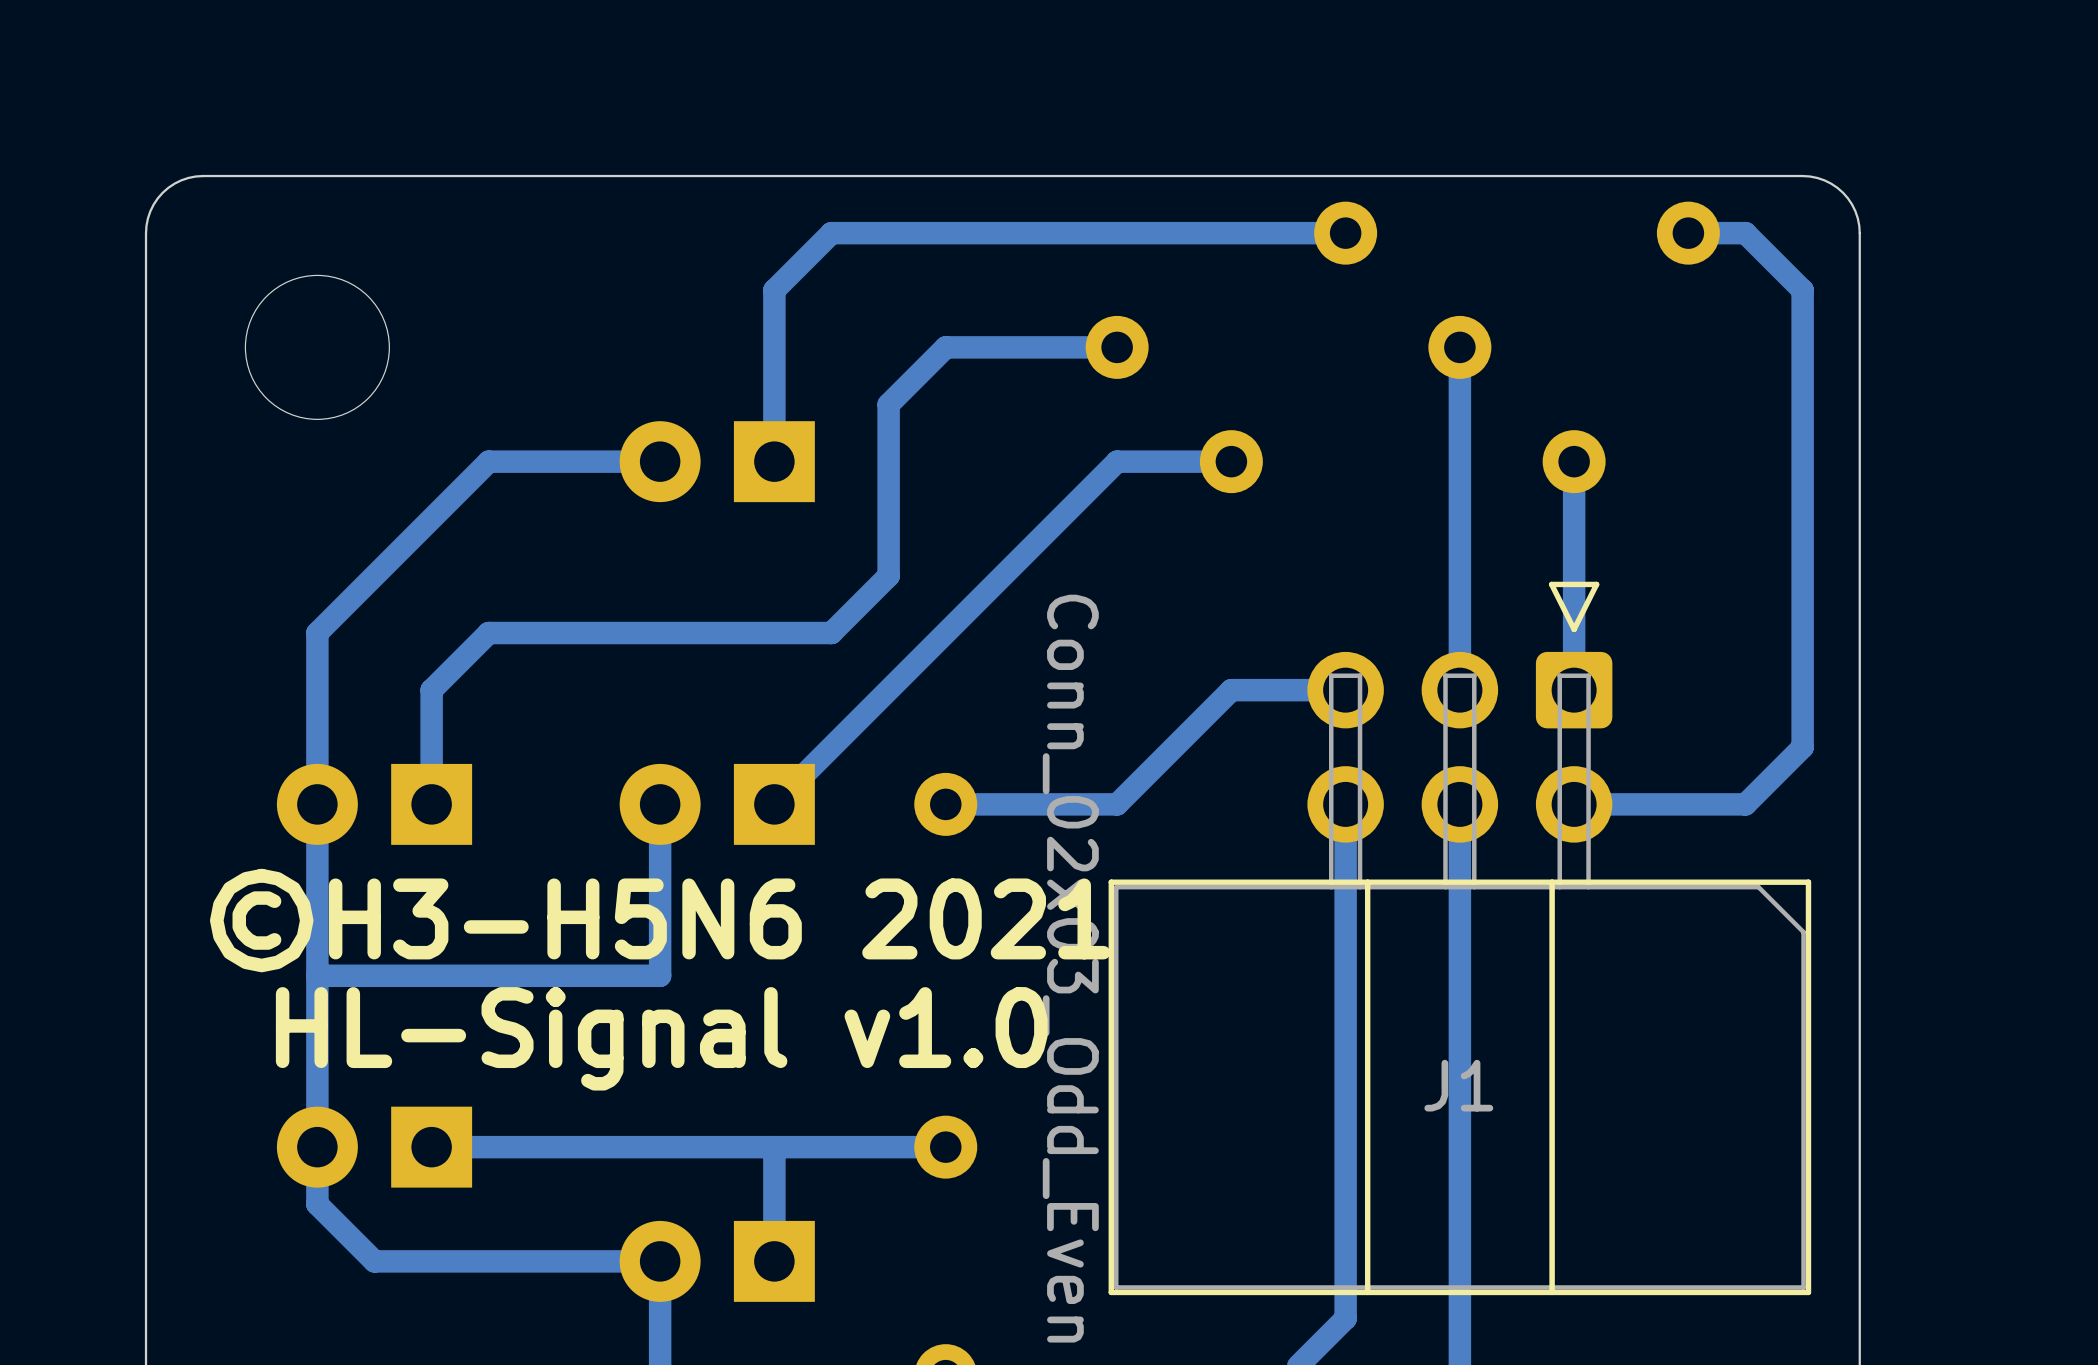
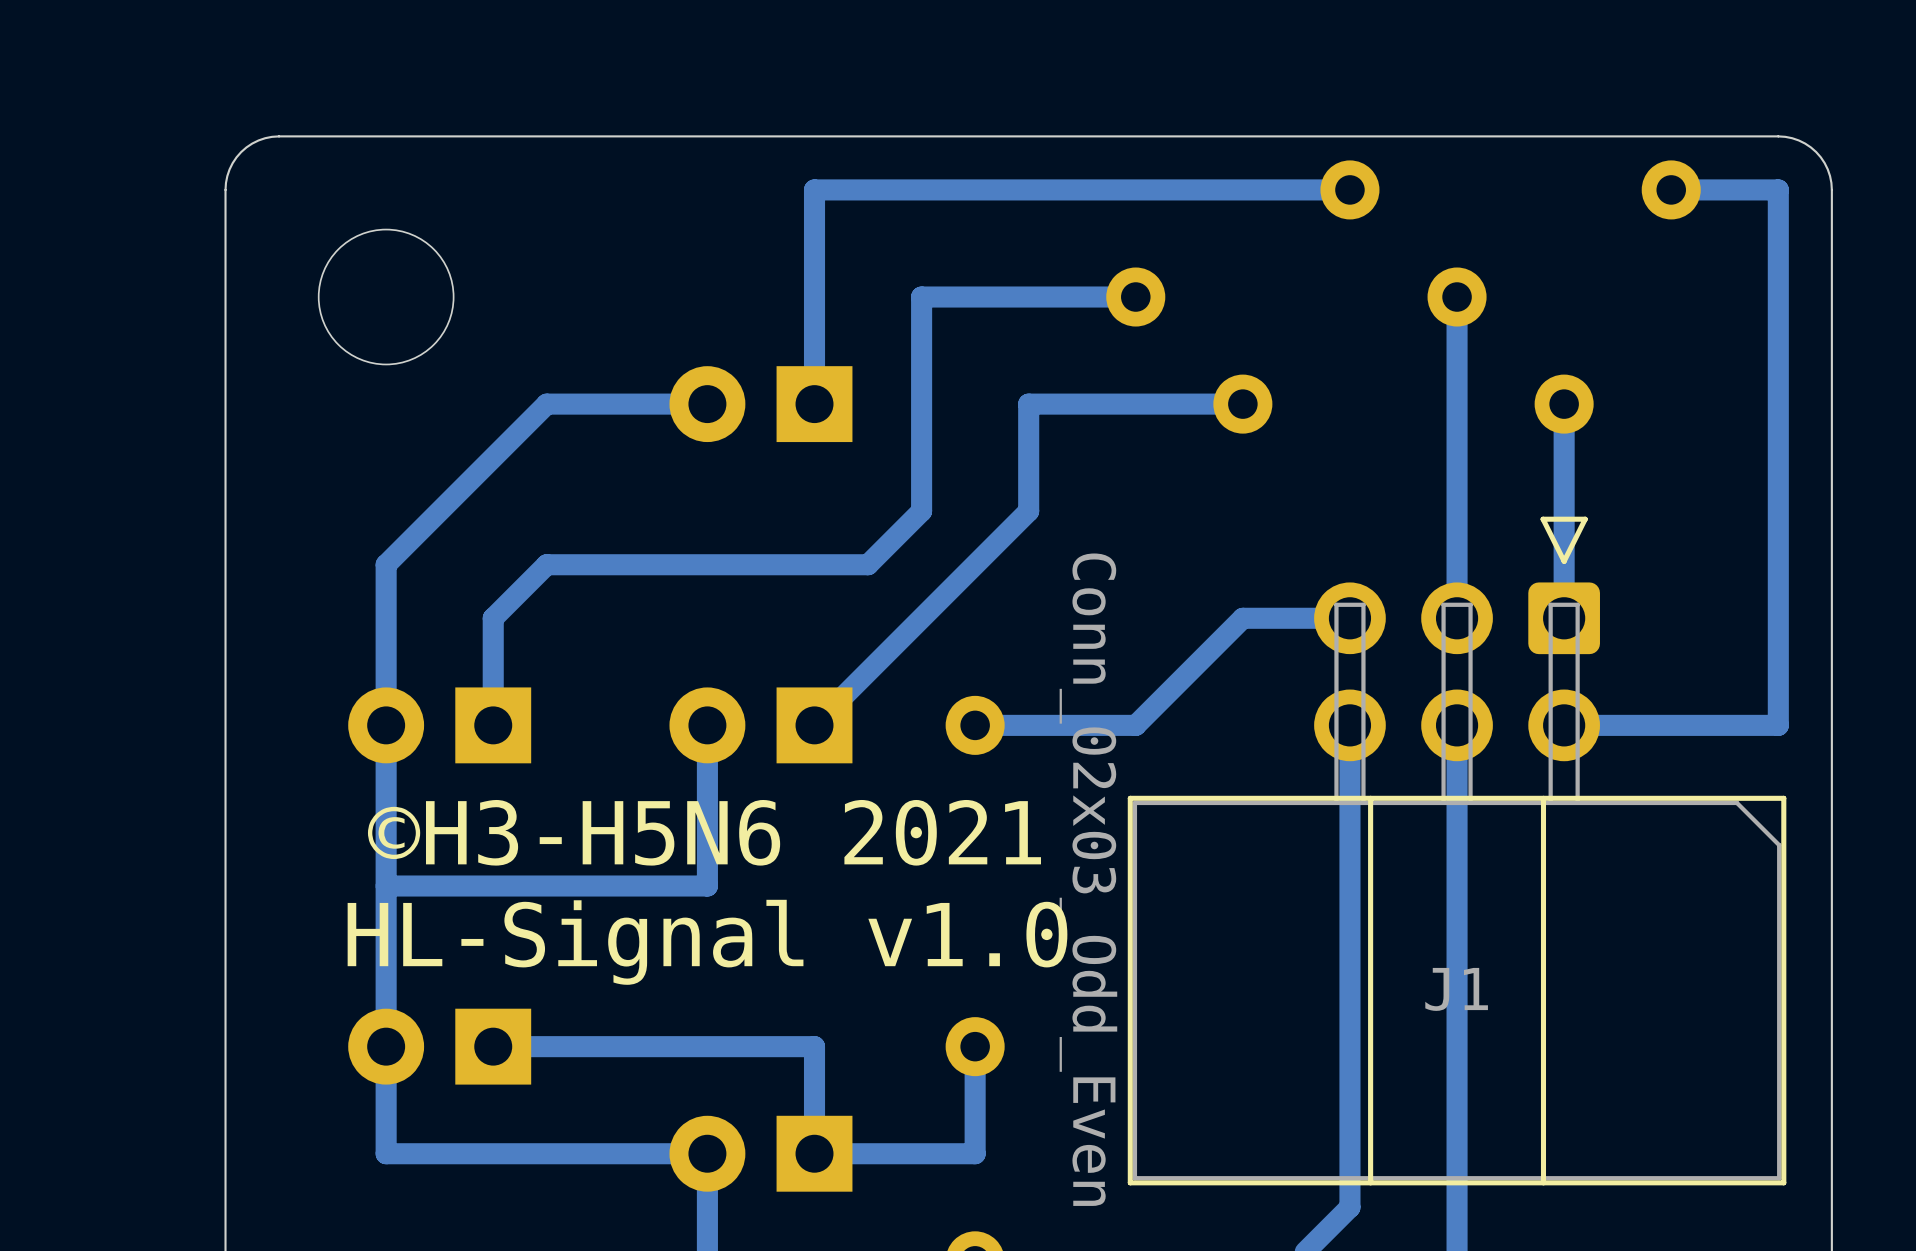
track: (831, 233) (774, 290) -> (868, 189) (814, 189) (814, 243)
track: (1745, 233) (1802, 290) -> (1724, 189) (1778, 189) (1778, 243)
track: (945, 347) (888, 404) -> (975, 297) (921, 297) (921, 350)
track: (1117, 461) (1002, 575) -> (1135, 404) (1028, 404) (1028, 511)
track: (1802, 747) (1745, 804) -> (1778, 671) (1778, 725) (1724, 725)
track: (945, 1147) (774, 1147) -> (975, 1046) (975, 1153) (814, 1153)
track: (317, 1204) (374, 1261) -> (386, 1100) (386, 1153) (439, 1153)

